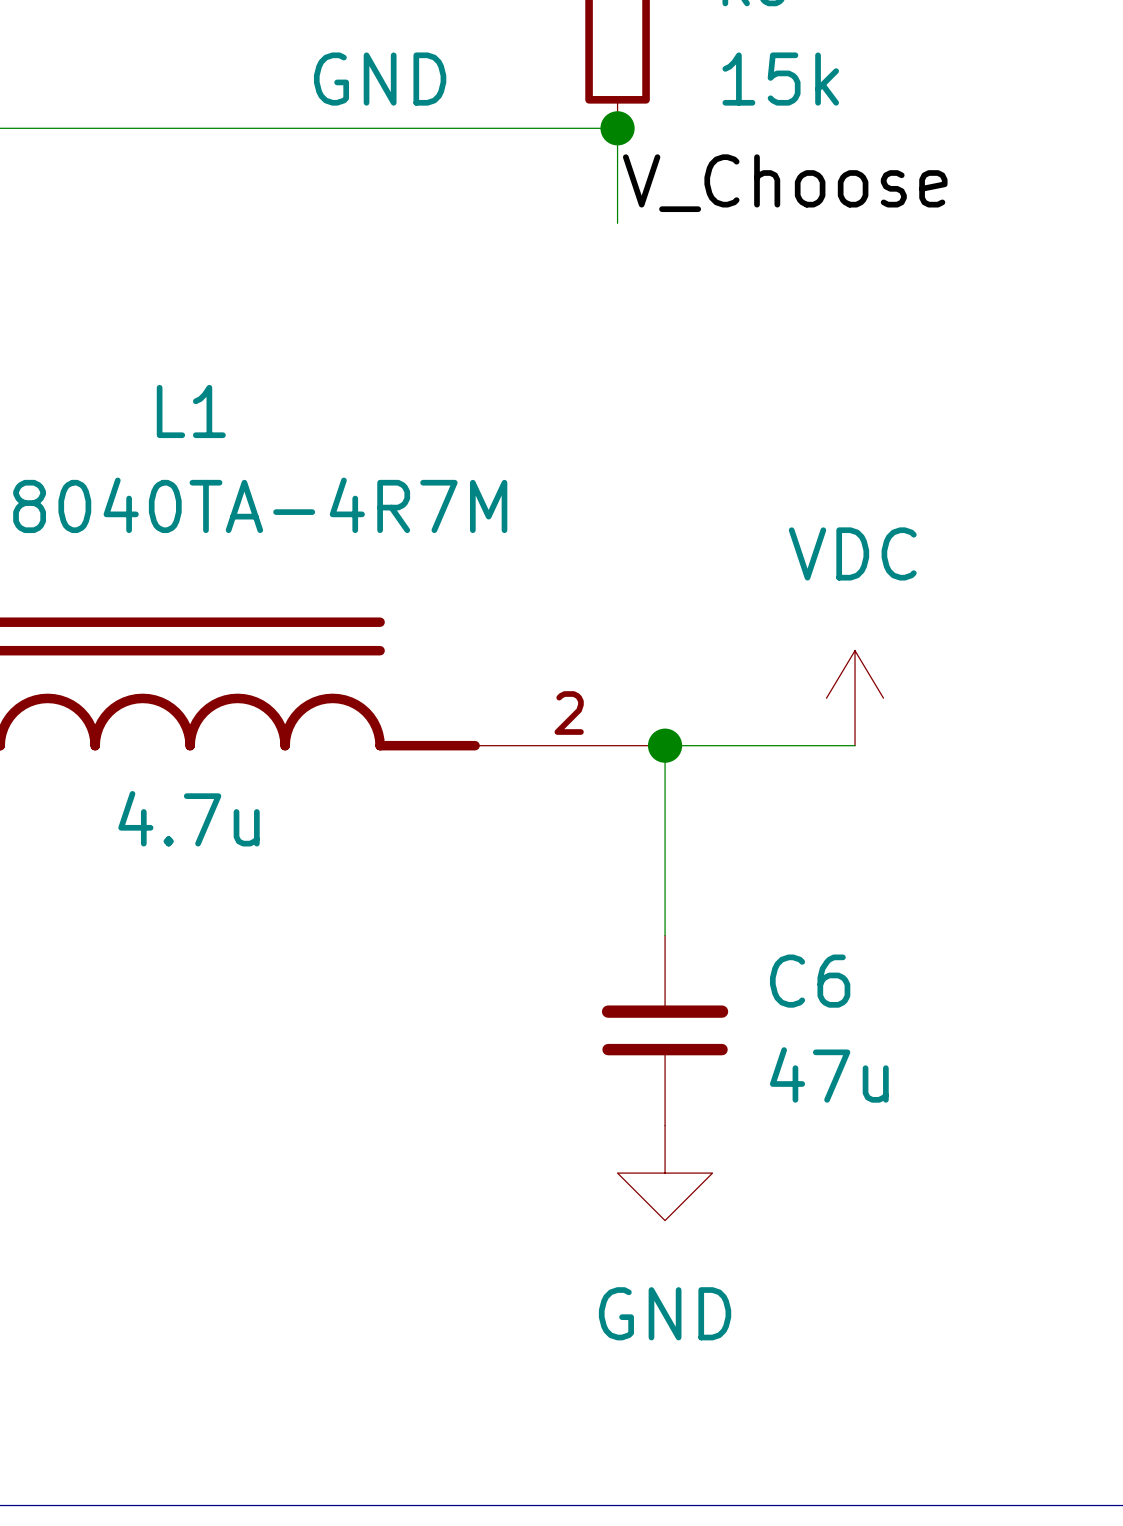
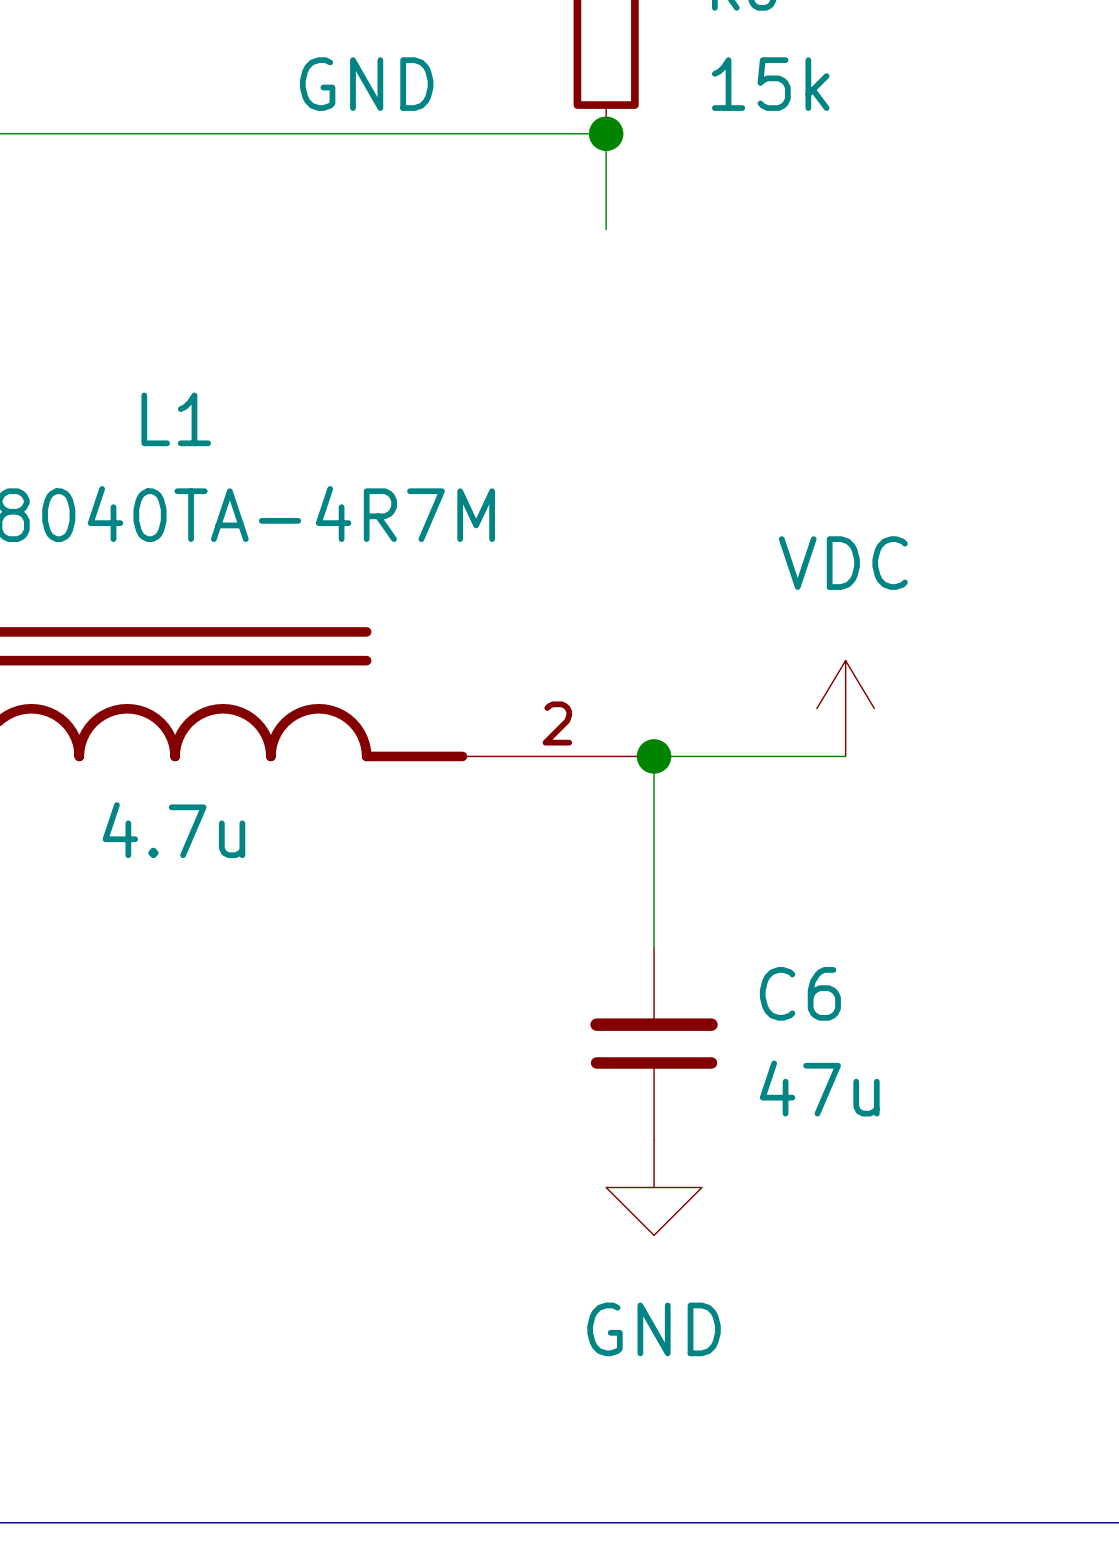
label: V_Choose (785, 183) -> none

